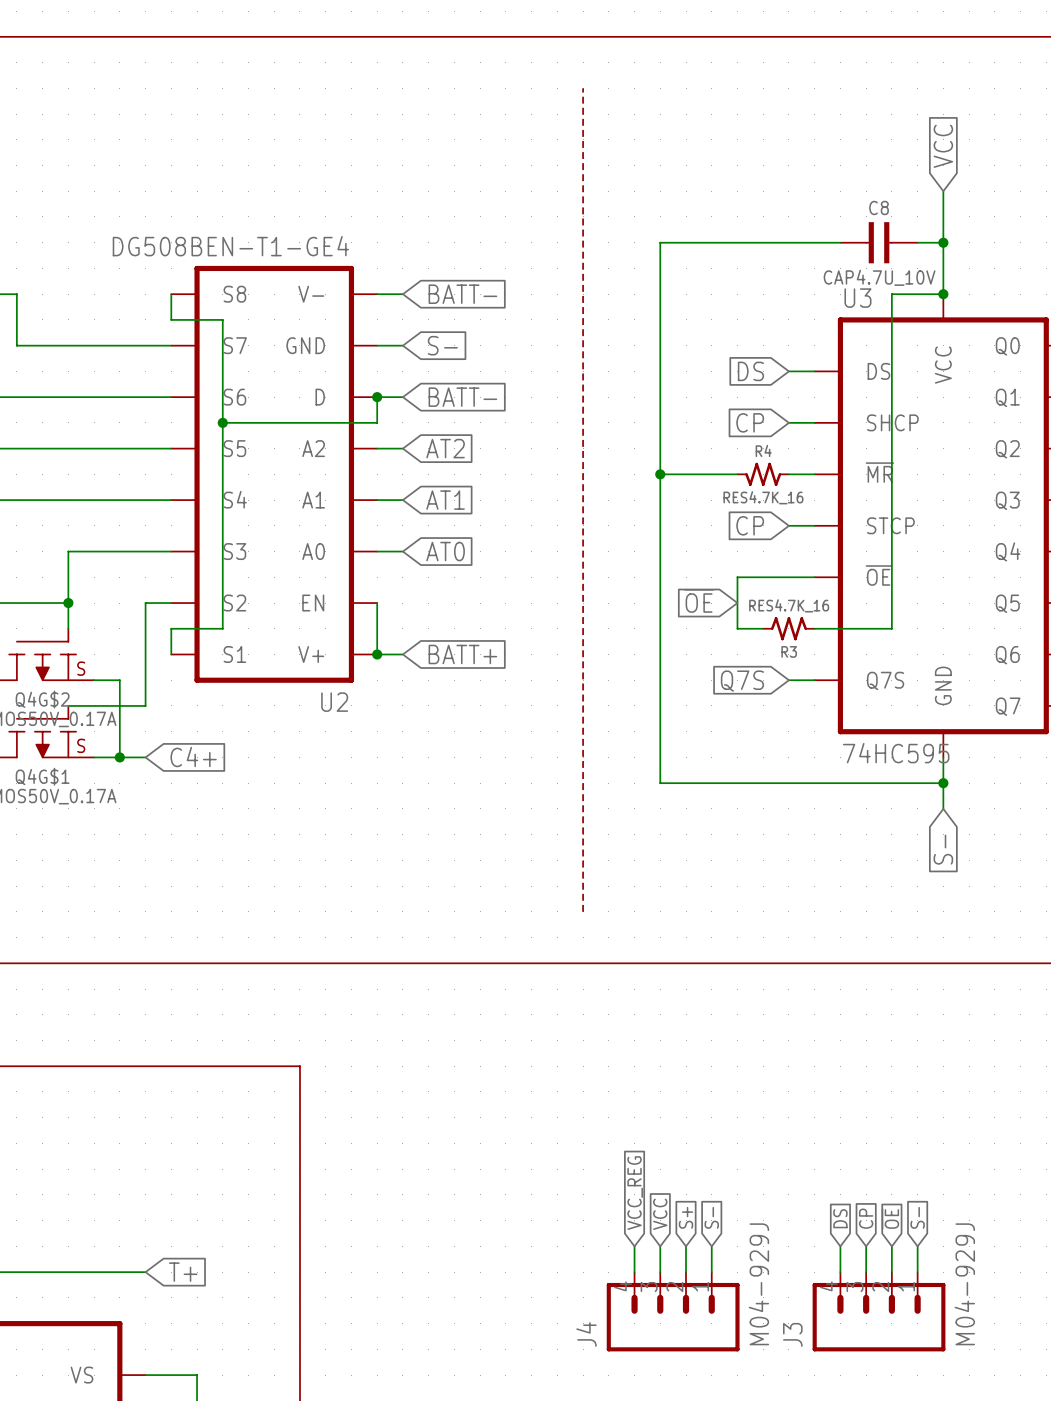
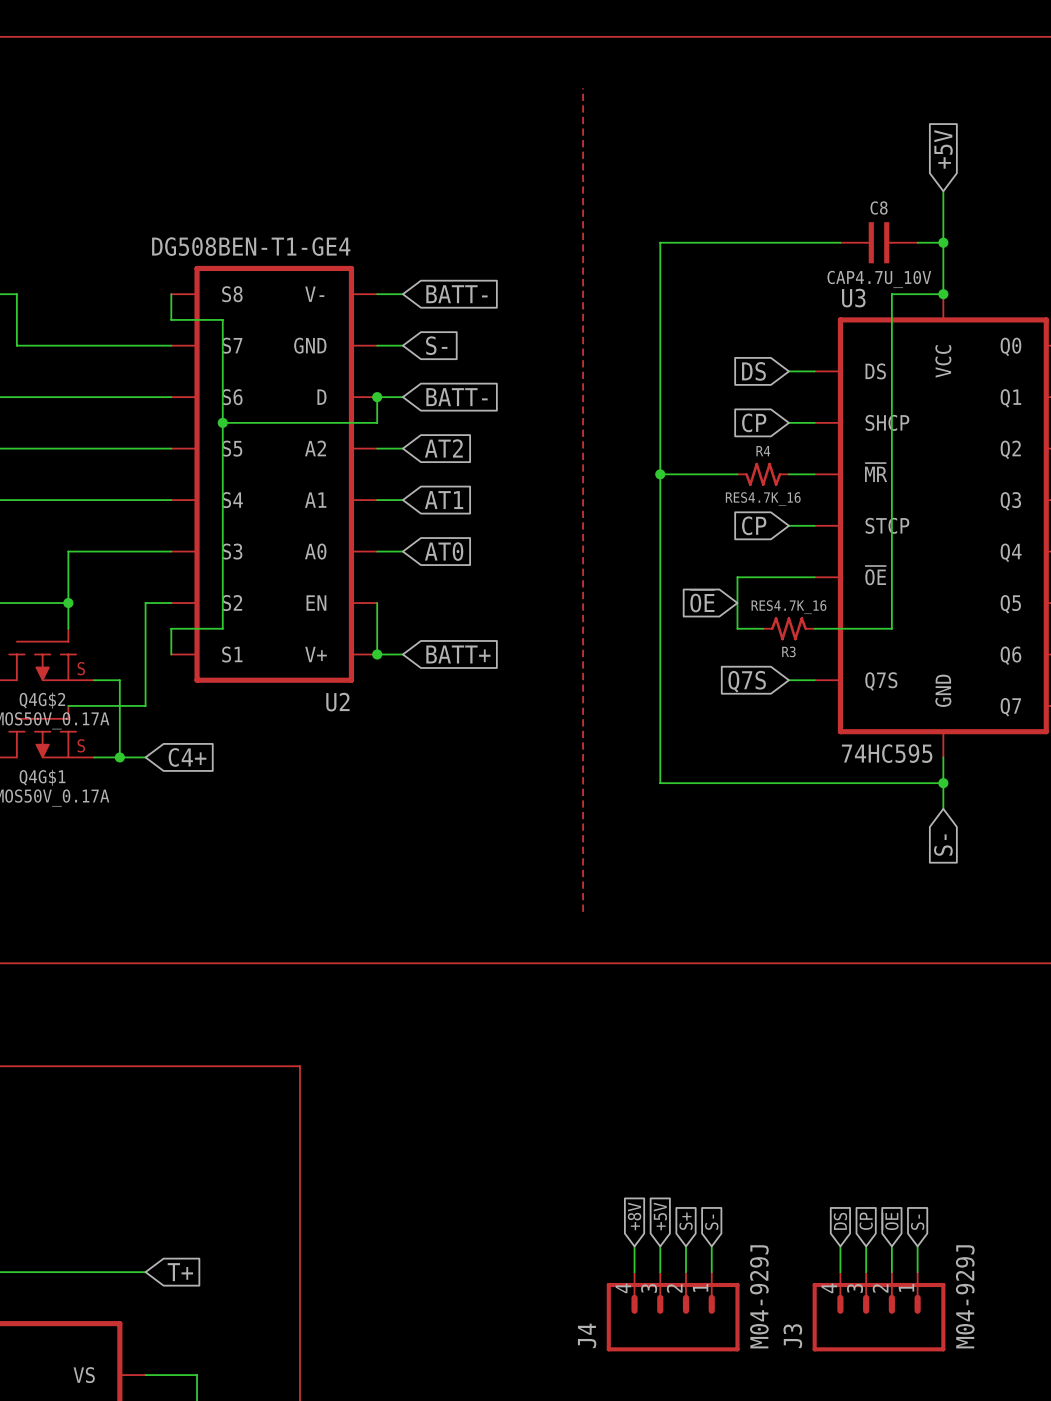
global label: VCC (943, 146) -> +5V (943, 149)
global label: VCC_REG (635, 1193) -> +8V (634, 1216)
global label: VCC (660, 1214) -> +5V (660, 1216)

